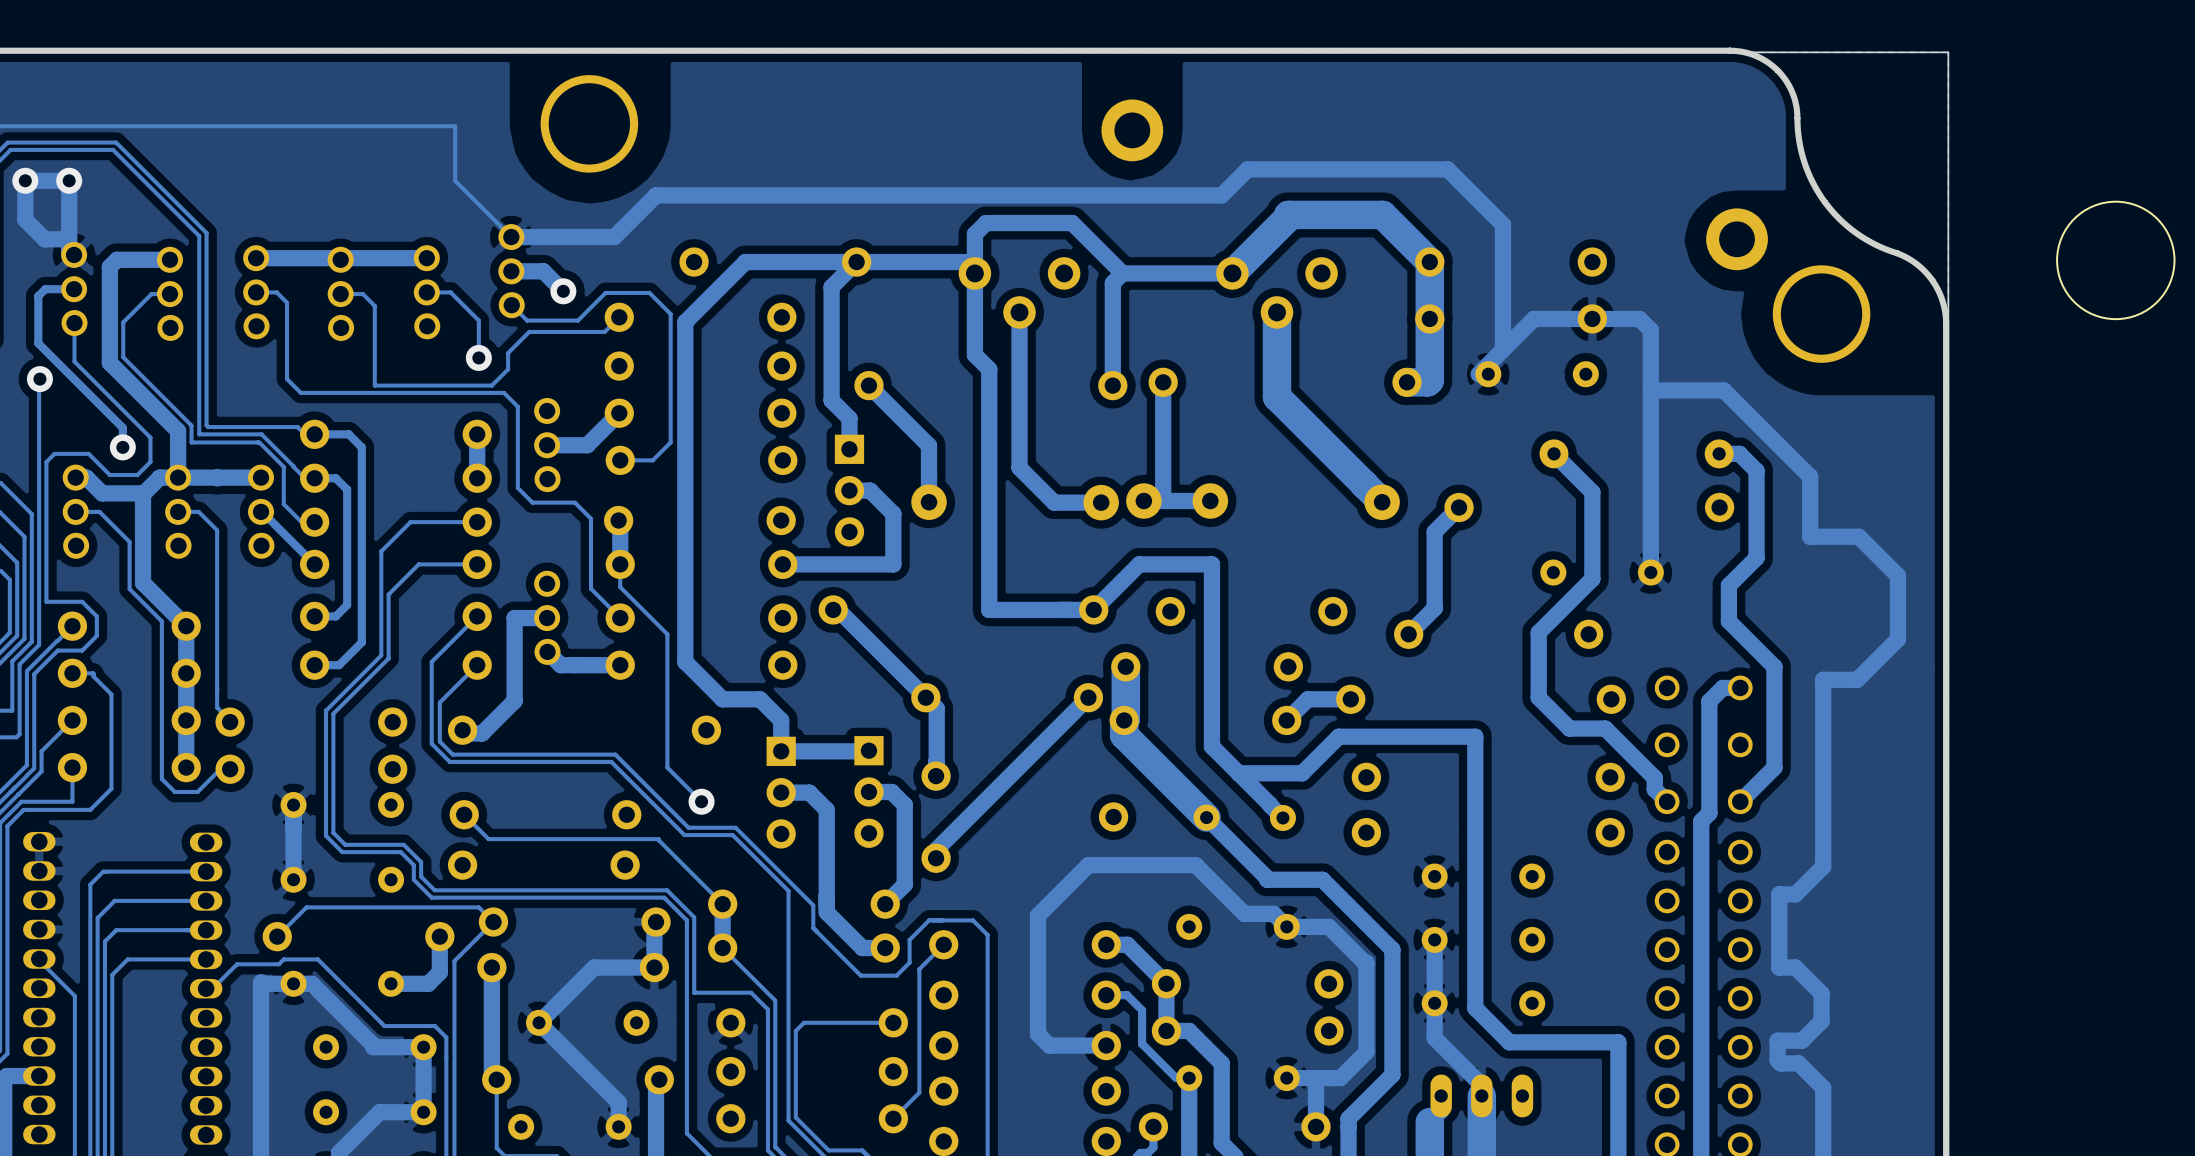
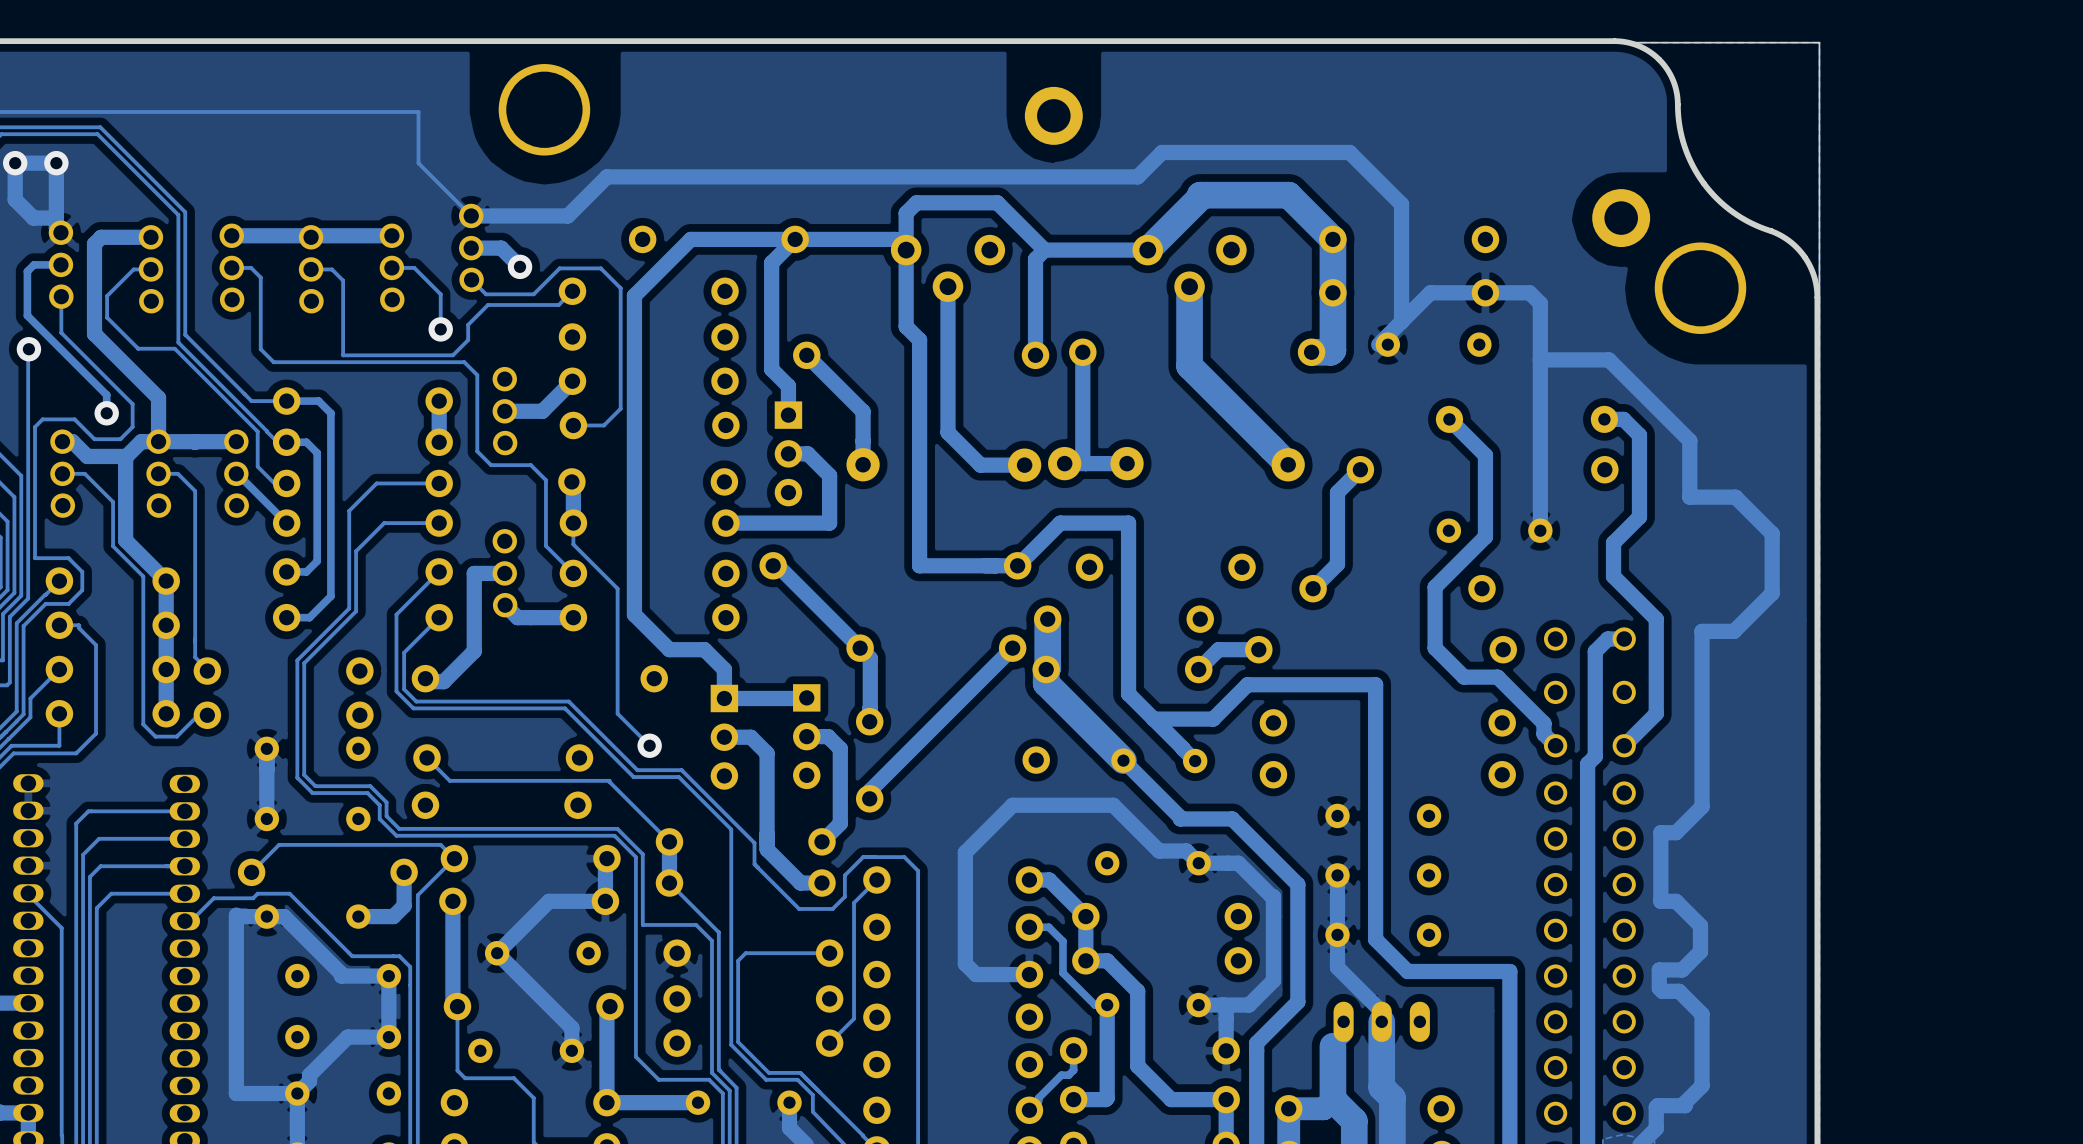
drawing: [2056, 200, 2176, 321] -> none
track: (123, 345) (123, 357) (191, 425) (191, 442) (259, 442) -> (107, 317) (138, 348) (174, 348) (234, 408)
track: (206, 363) (206, 425) (208, 427) (297, 427) (304, 434) -> (185, 334) (251, 401) (277, 401)
track: (199, 372) (199, 434) (261, 434) -> (178, 342) (236, 401)

